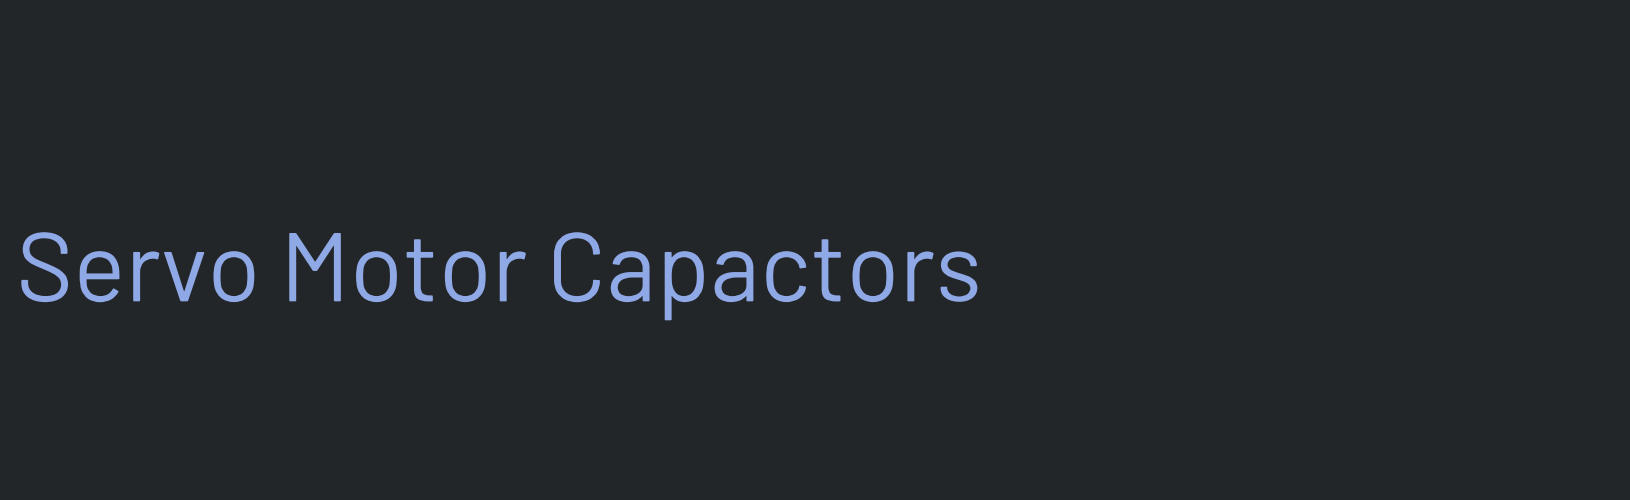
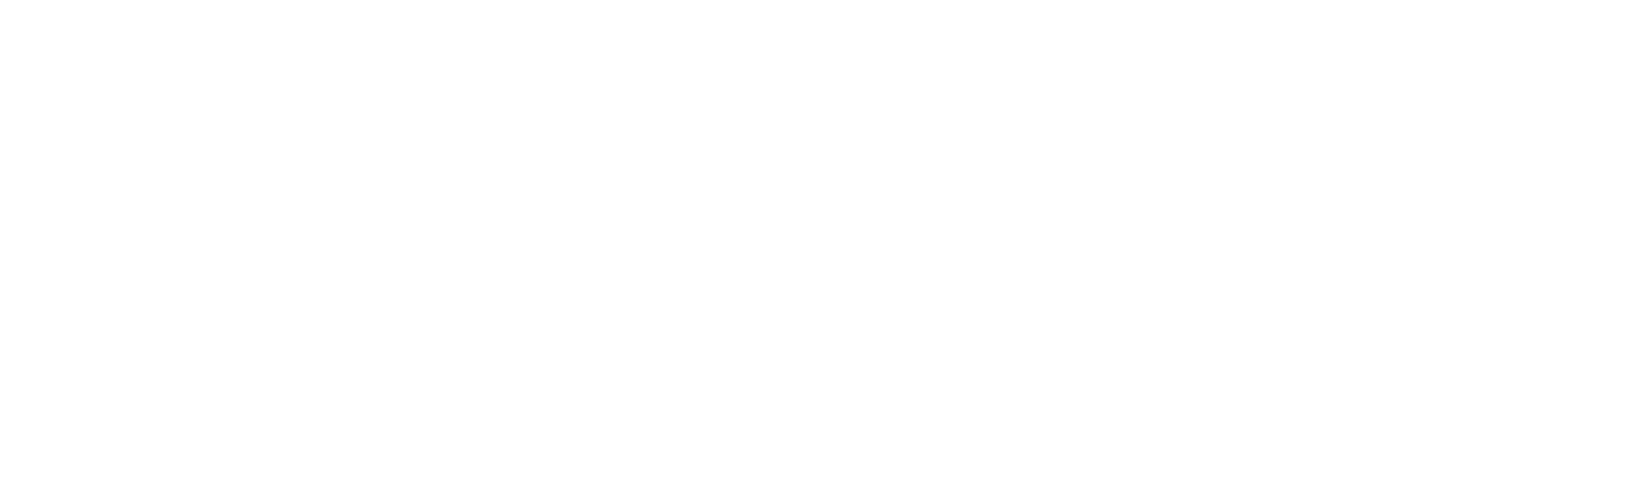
text: Servo Motor Capactors (499, 276) -> none

